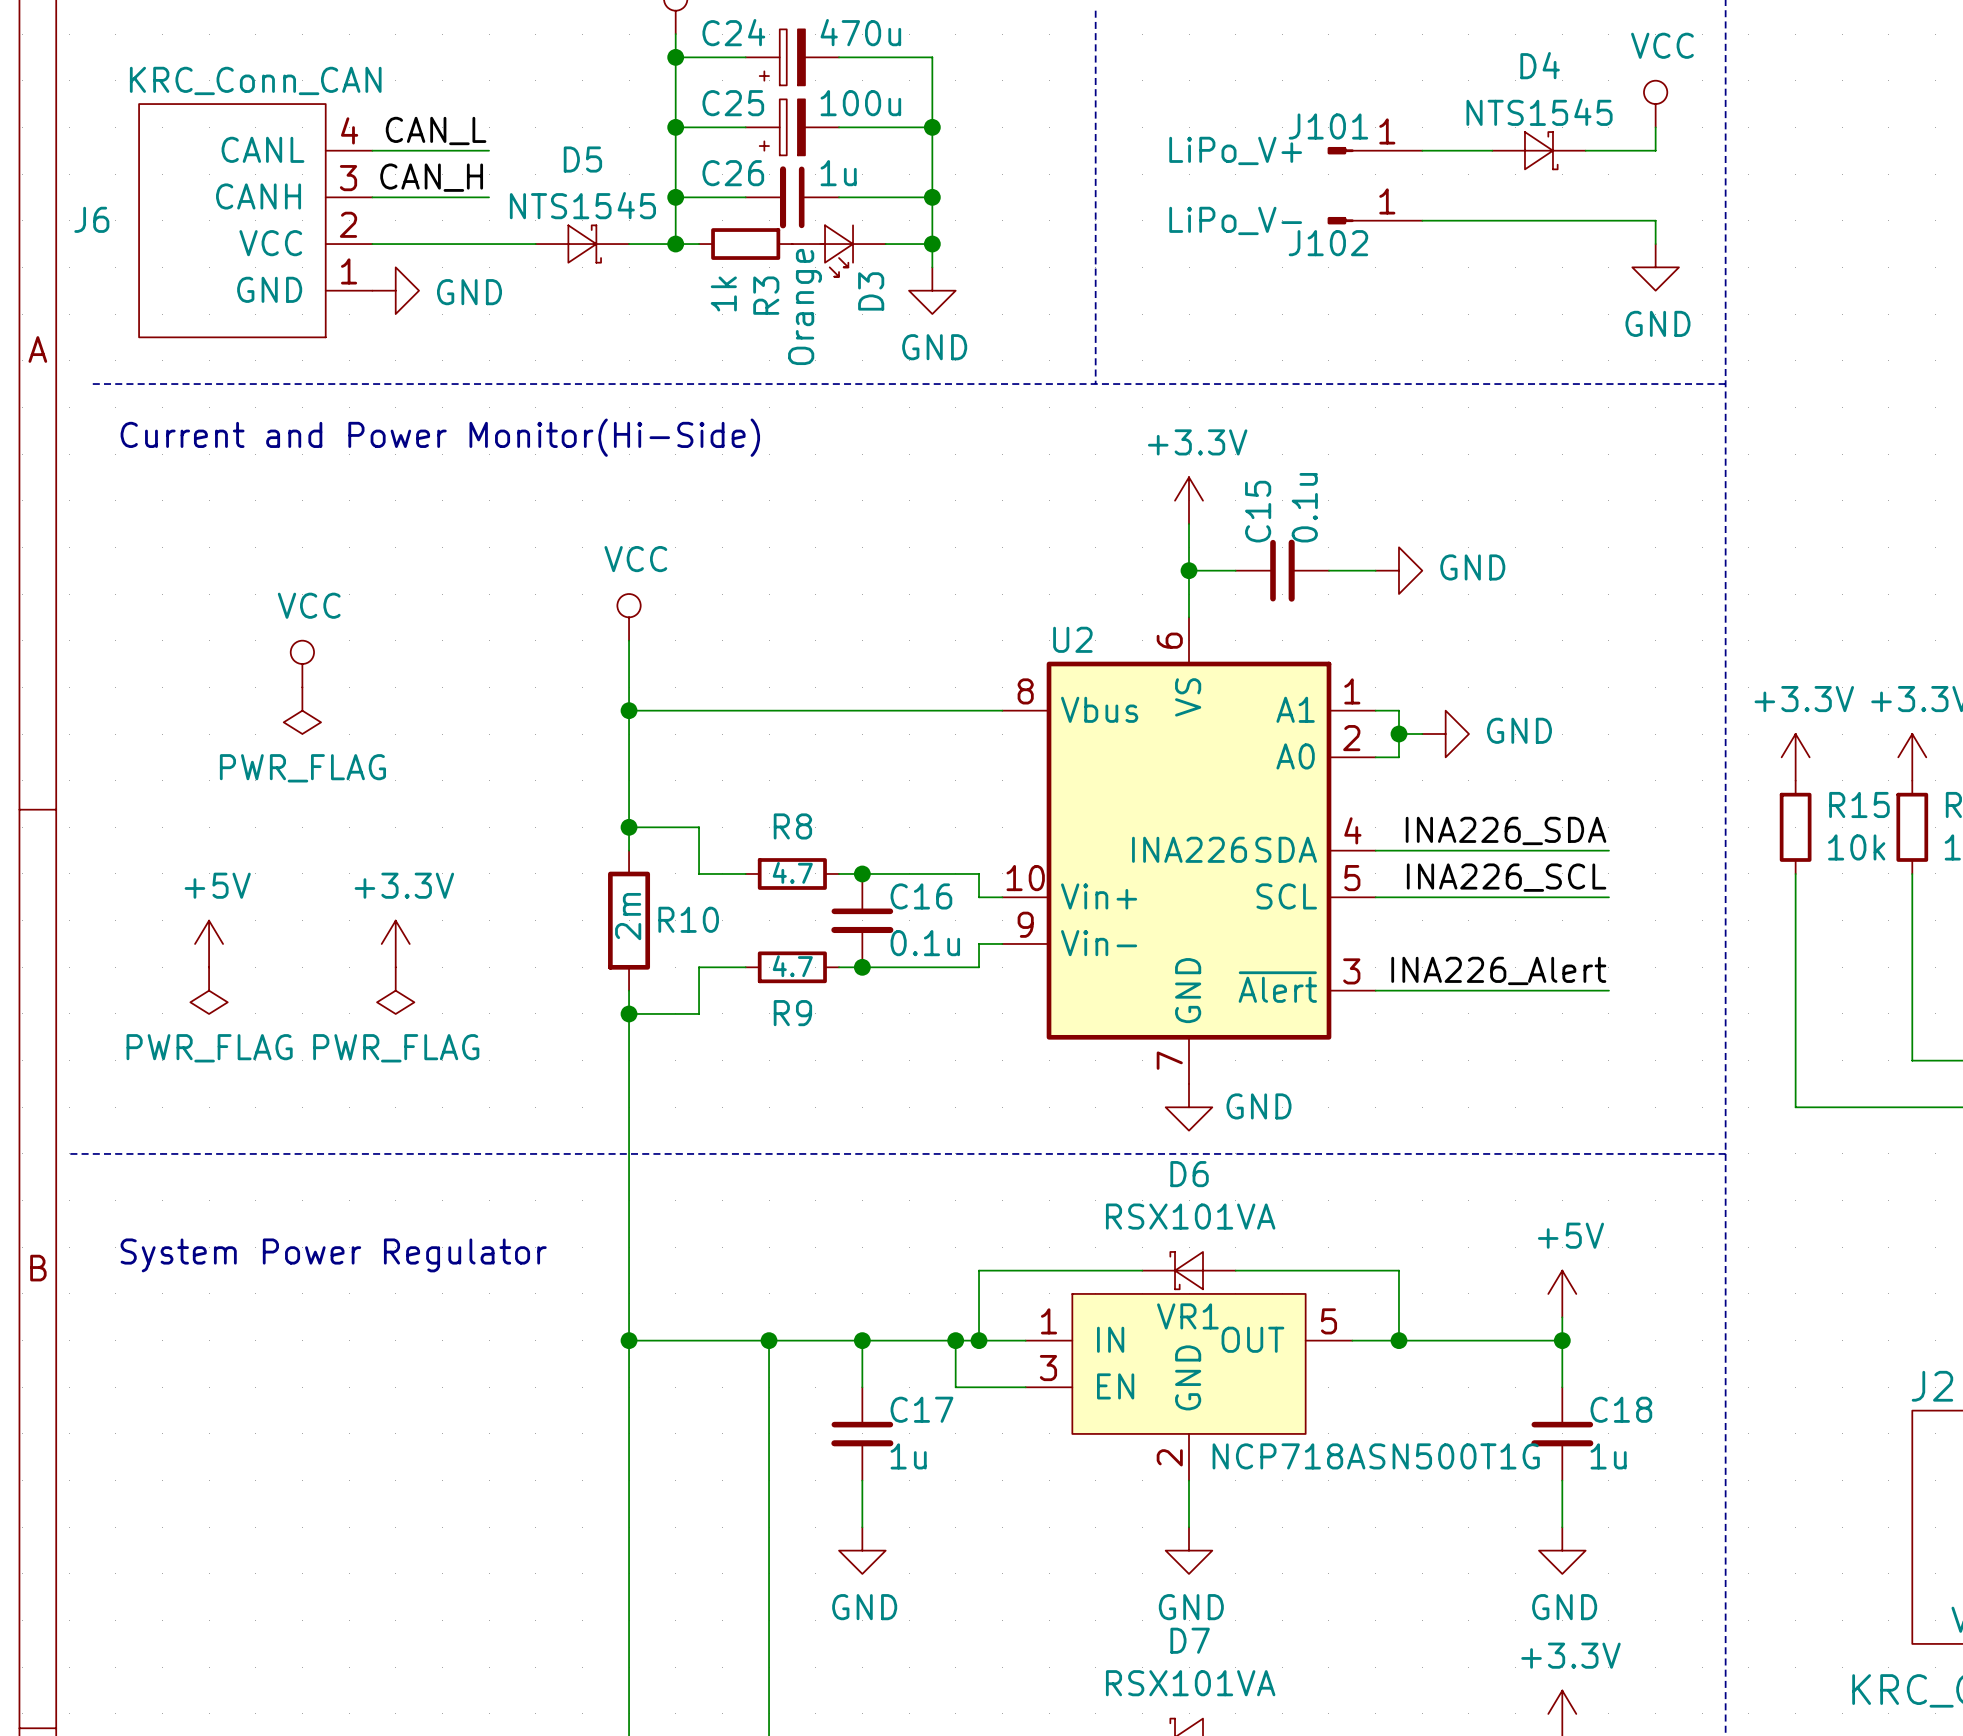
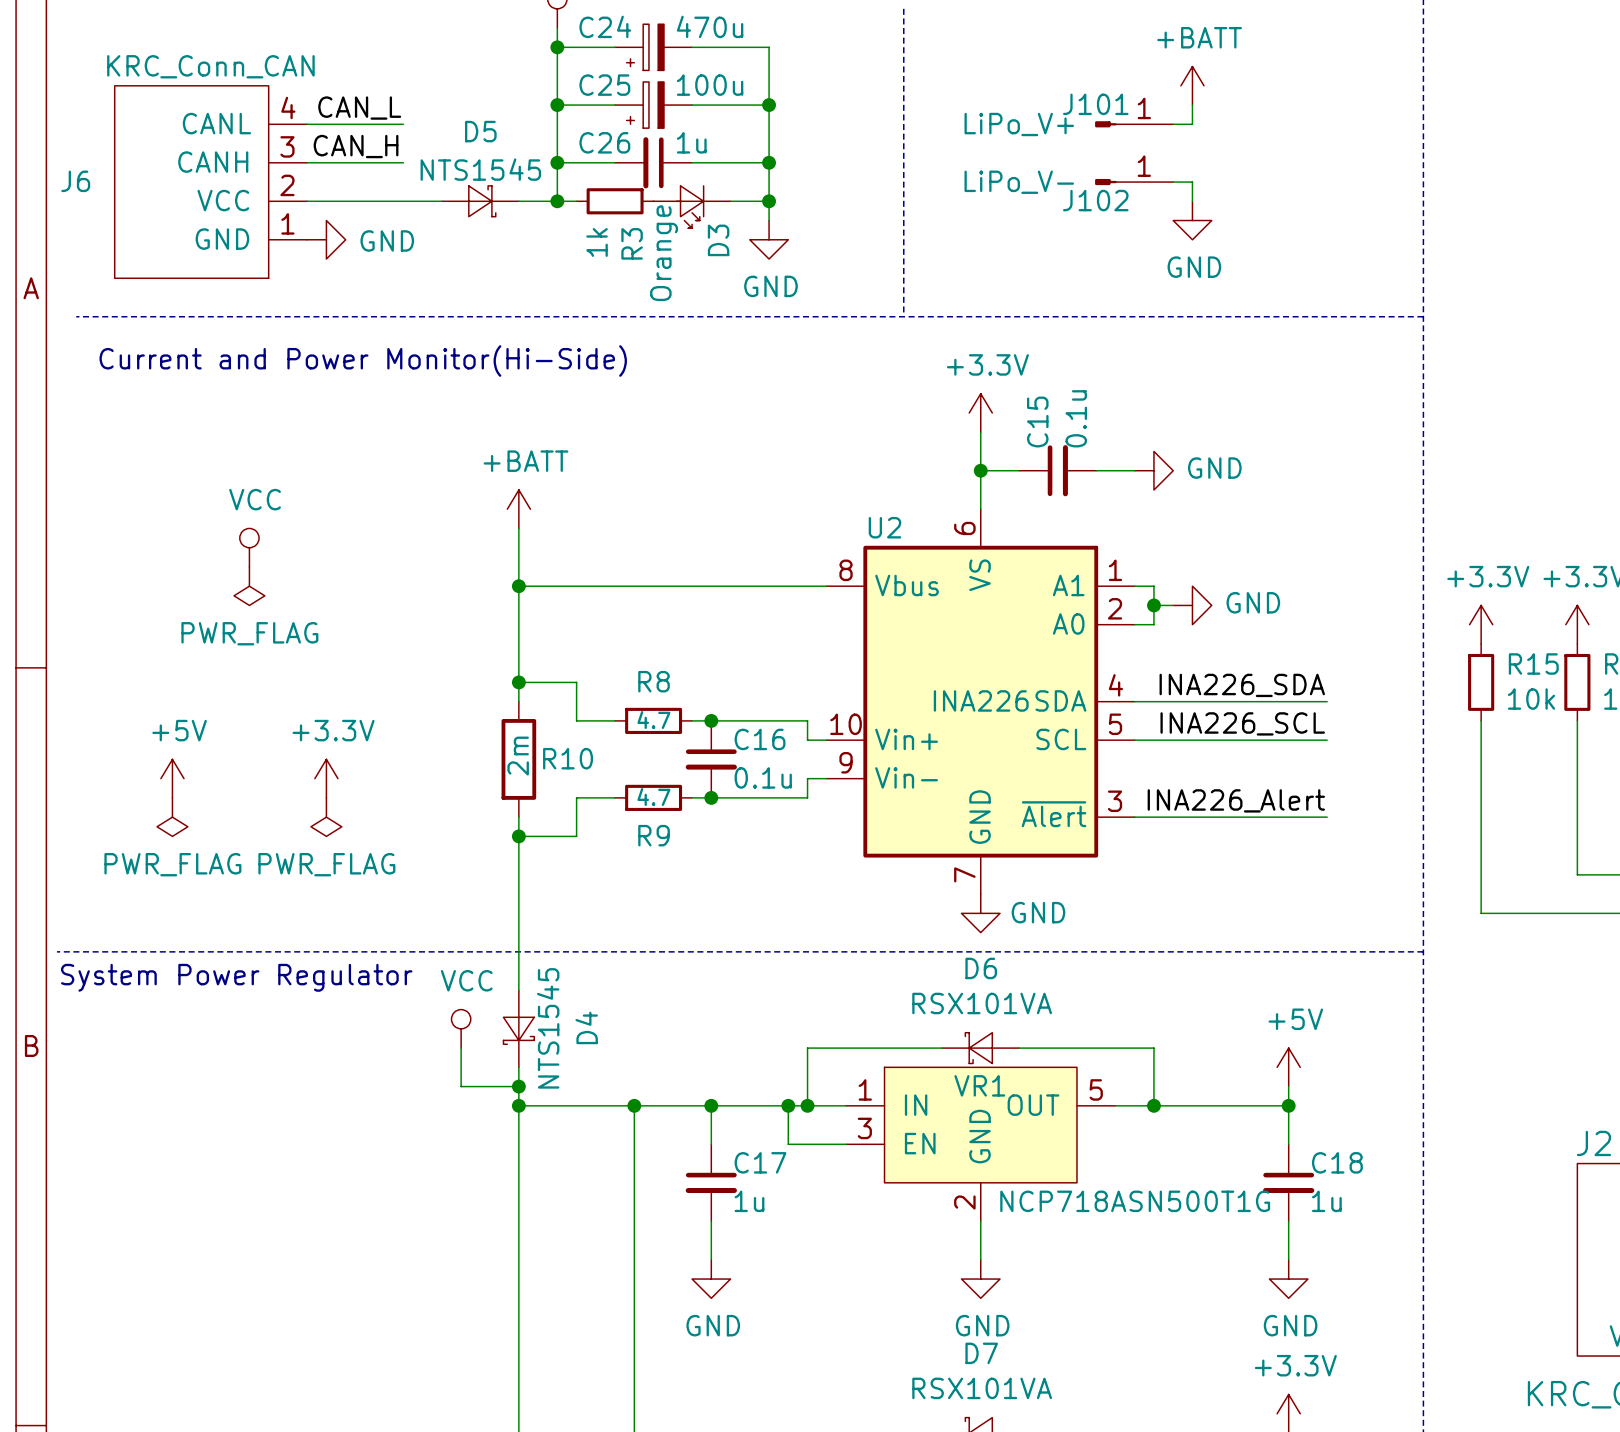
power symbol: none -> +BATT (1192, 85)
power symbol: VCC (1655, 104) -> none
wire: (1655, 127) (1655, 150) (1585, 150) -> none
wire: (1445, 150) (1492, 150) -> (1192, 124) (1192, 105)
D4 position: (1538, 150) -> (518, 1028)
D4 rotation: 0° (1541, 150) -> 90° clockwise (518, 1030)
wire: (1445, 220) (1655, 220) (1655, 244) -> (1192, 182) (1192, 201)
power symbol position: GND (1655, 267) -> GND (1192, 220)
power symbol: VCC (629, 617) -> +BATT (518, 509)
power symbol: none -> VCC (461, 1028)
text position: System Power Regulator (333, 1255) -> System Power Regulator (236, 977)
wire: none -> (461, 1048) (461, 1086) (518, 1086)
junction: none -> (518, 1086)

